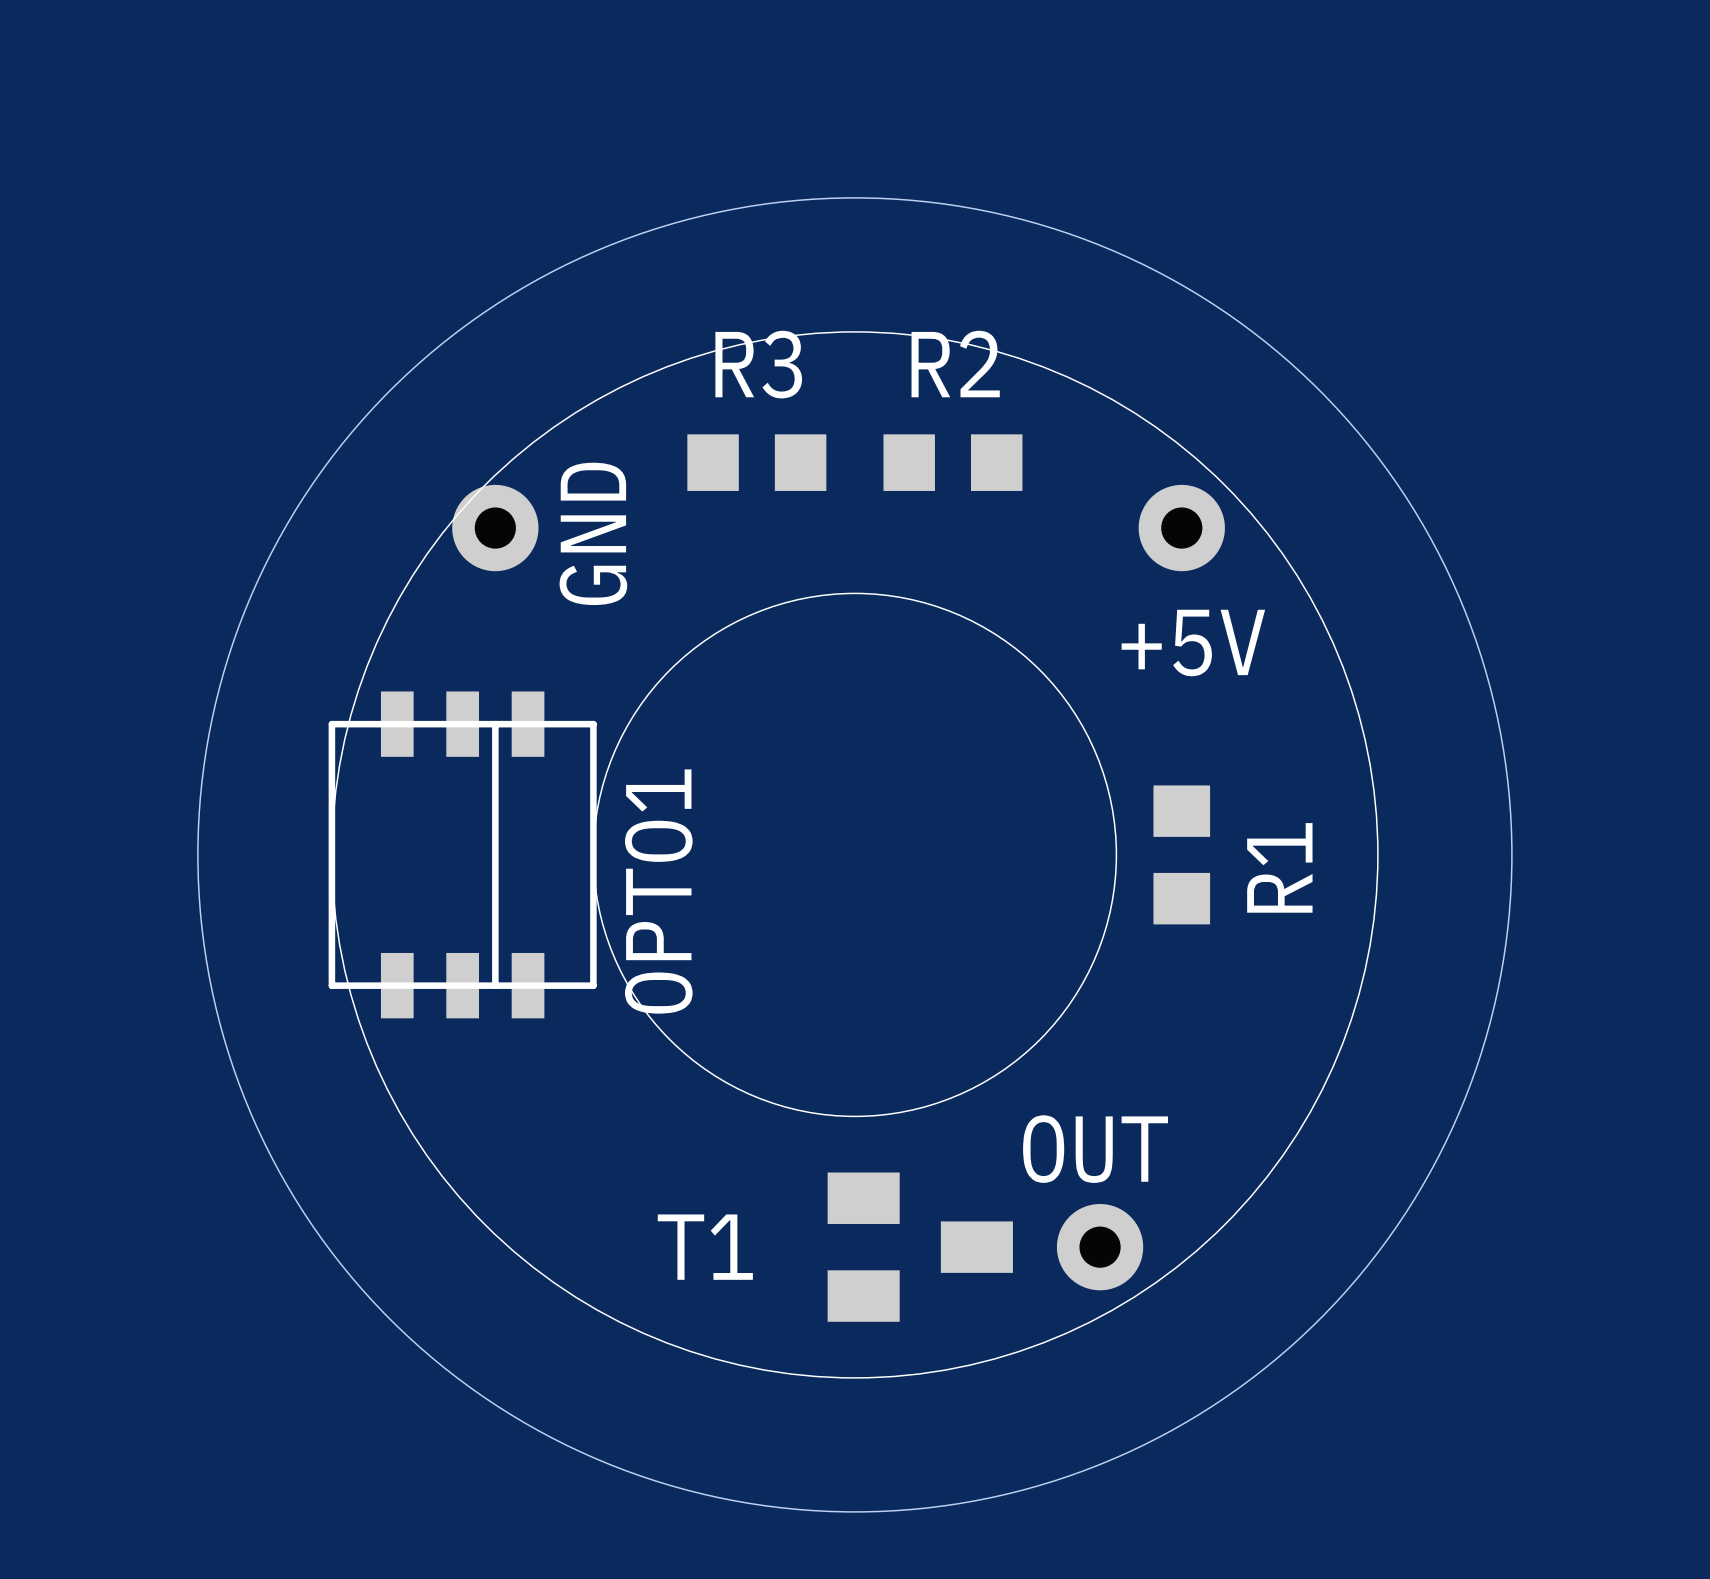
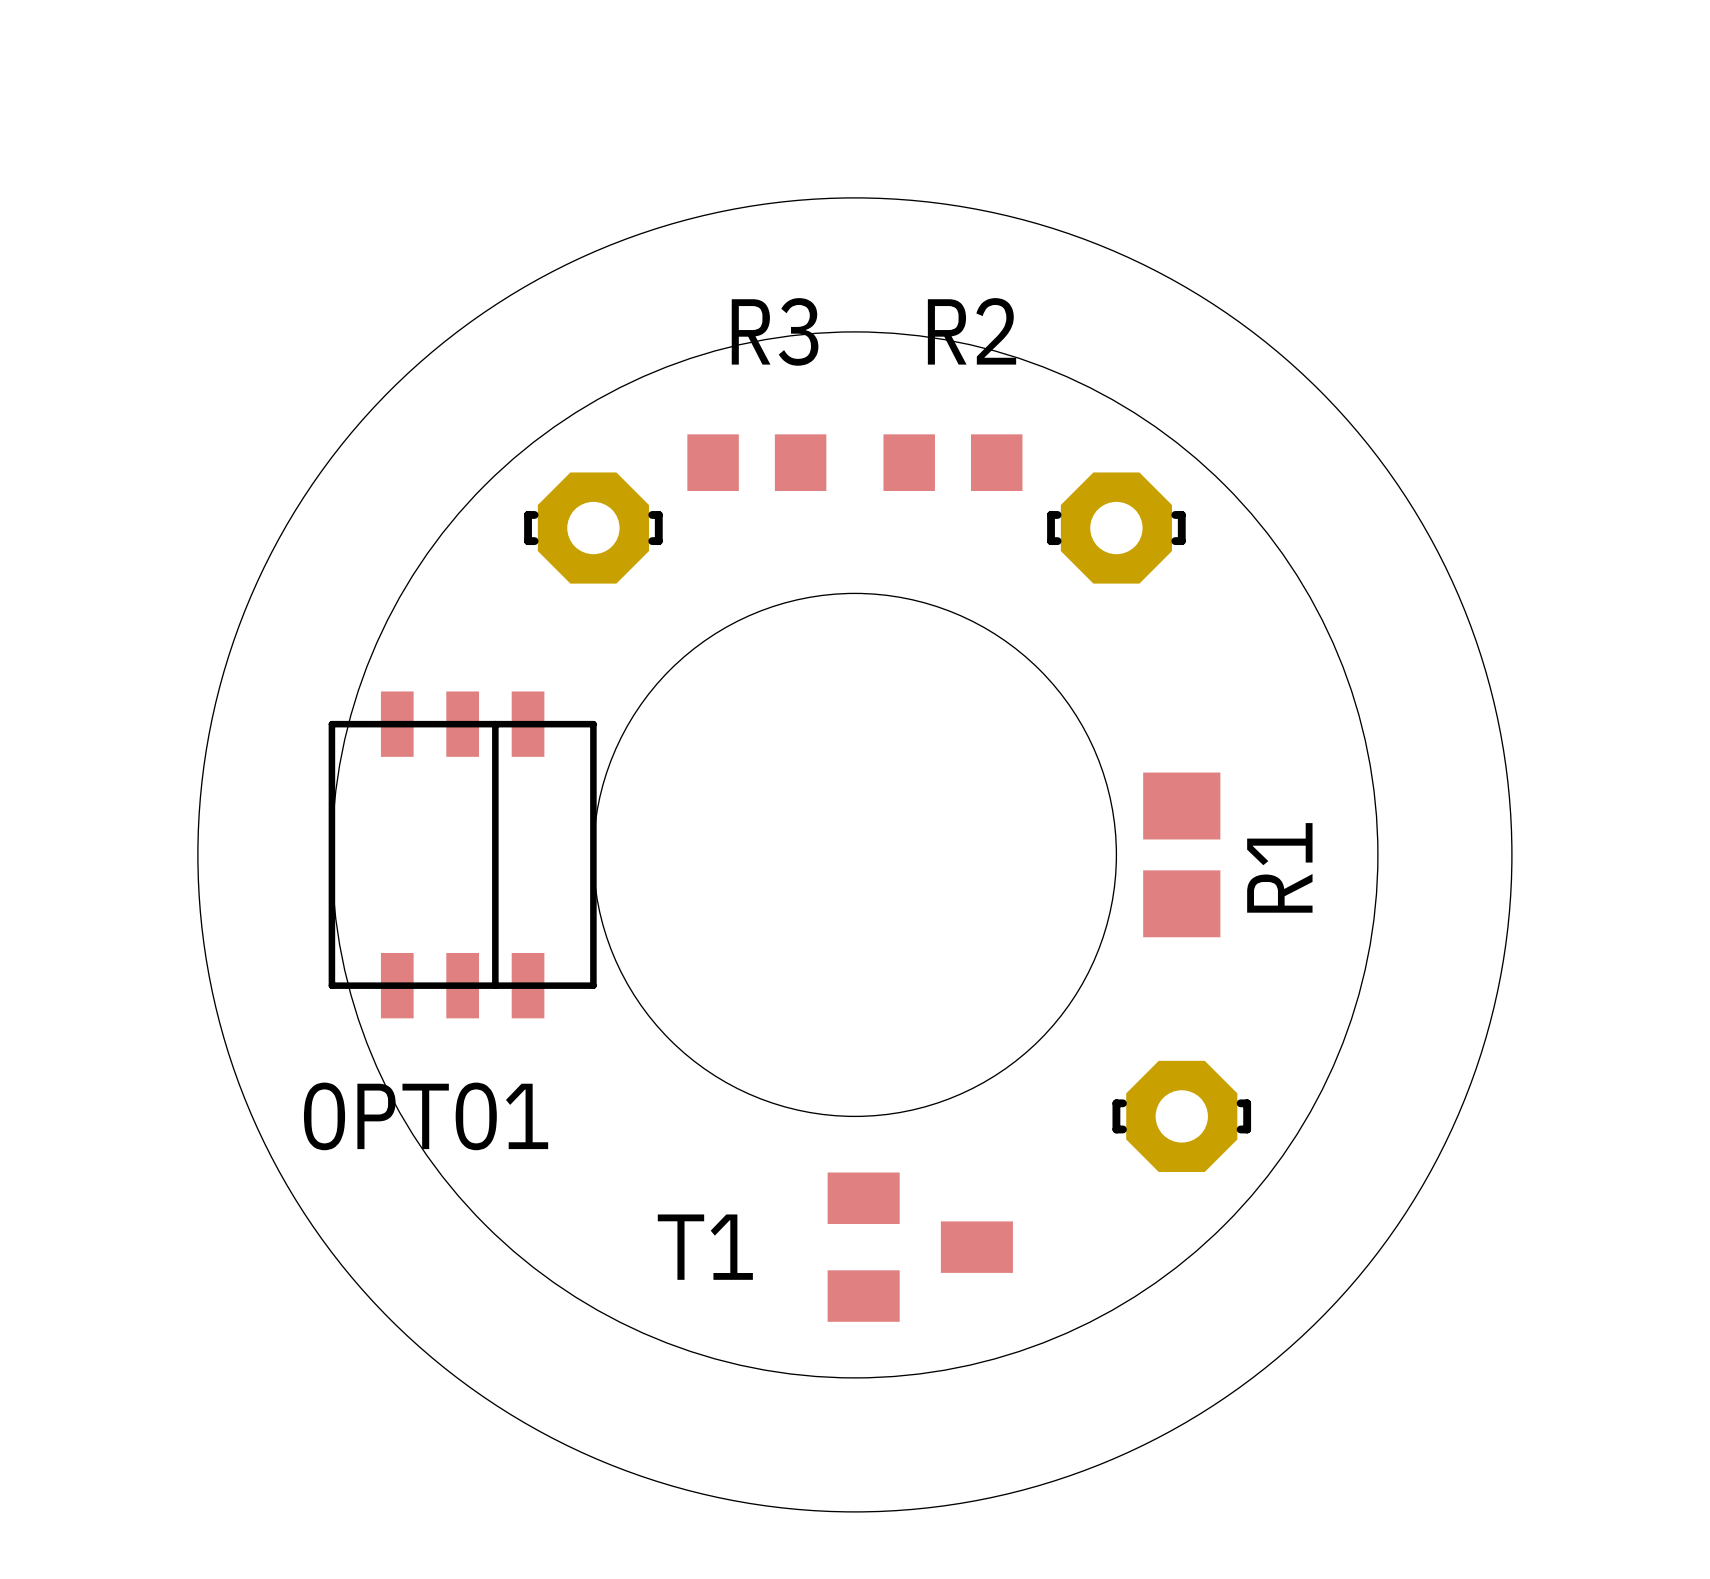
R3 name position: R3 (758, 364) -> R3 (775, 331)
R2 name position: R2 (955, 364) -> R2 (972, 331)
GND: (495, 528) -> none
part: none -> (593, 528)
part: none -> (1116, 528)
+5V: (1181, 528) -> none
R1 footprint: [1153, 785, 1211, 925] -> [1143, 772, 1221, 938]
OPTO1 name rotation: 0° (658, 891) -> 90° clockwise (426, 1116)
part: none -> (1181, 1116)
OUT: (1100, 1247) -> none

